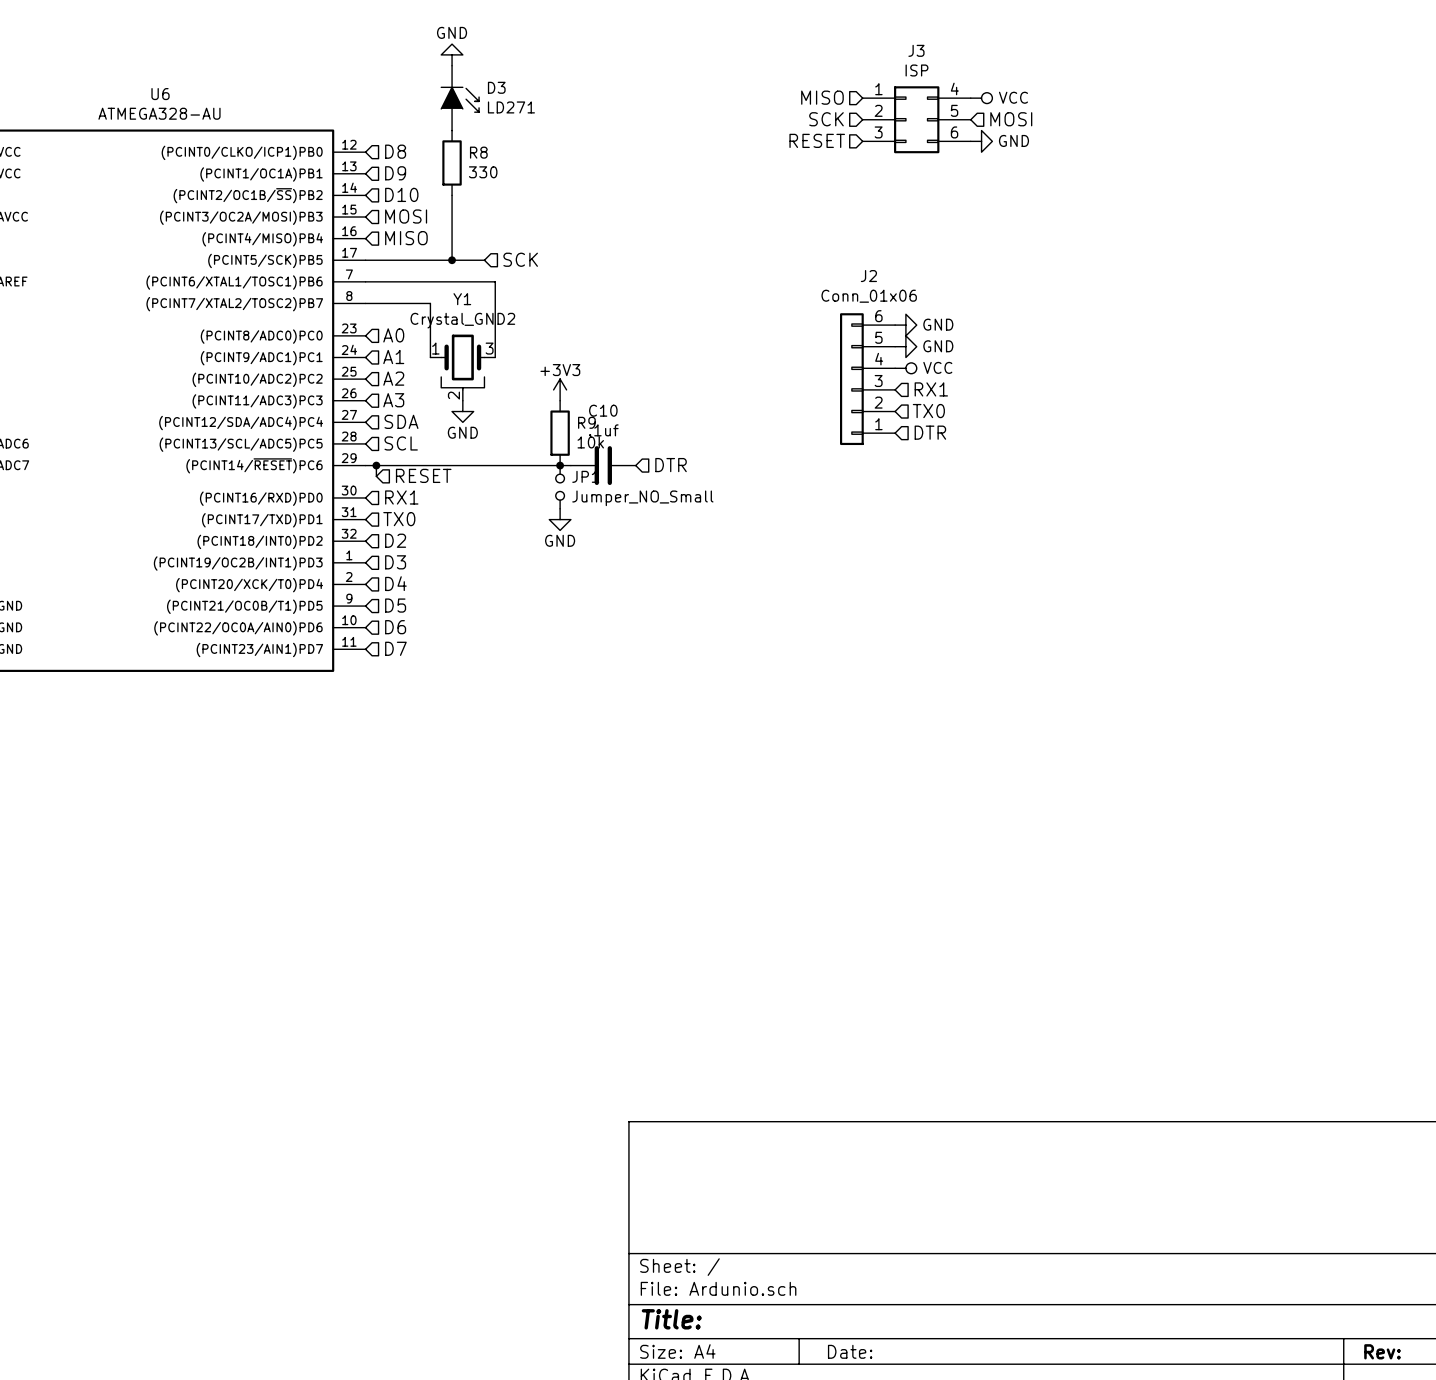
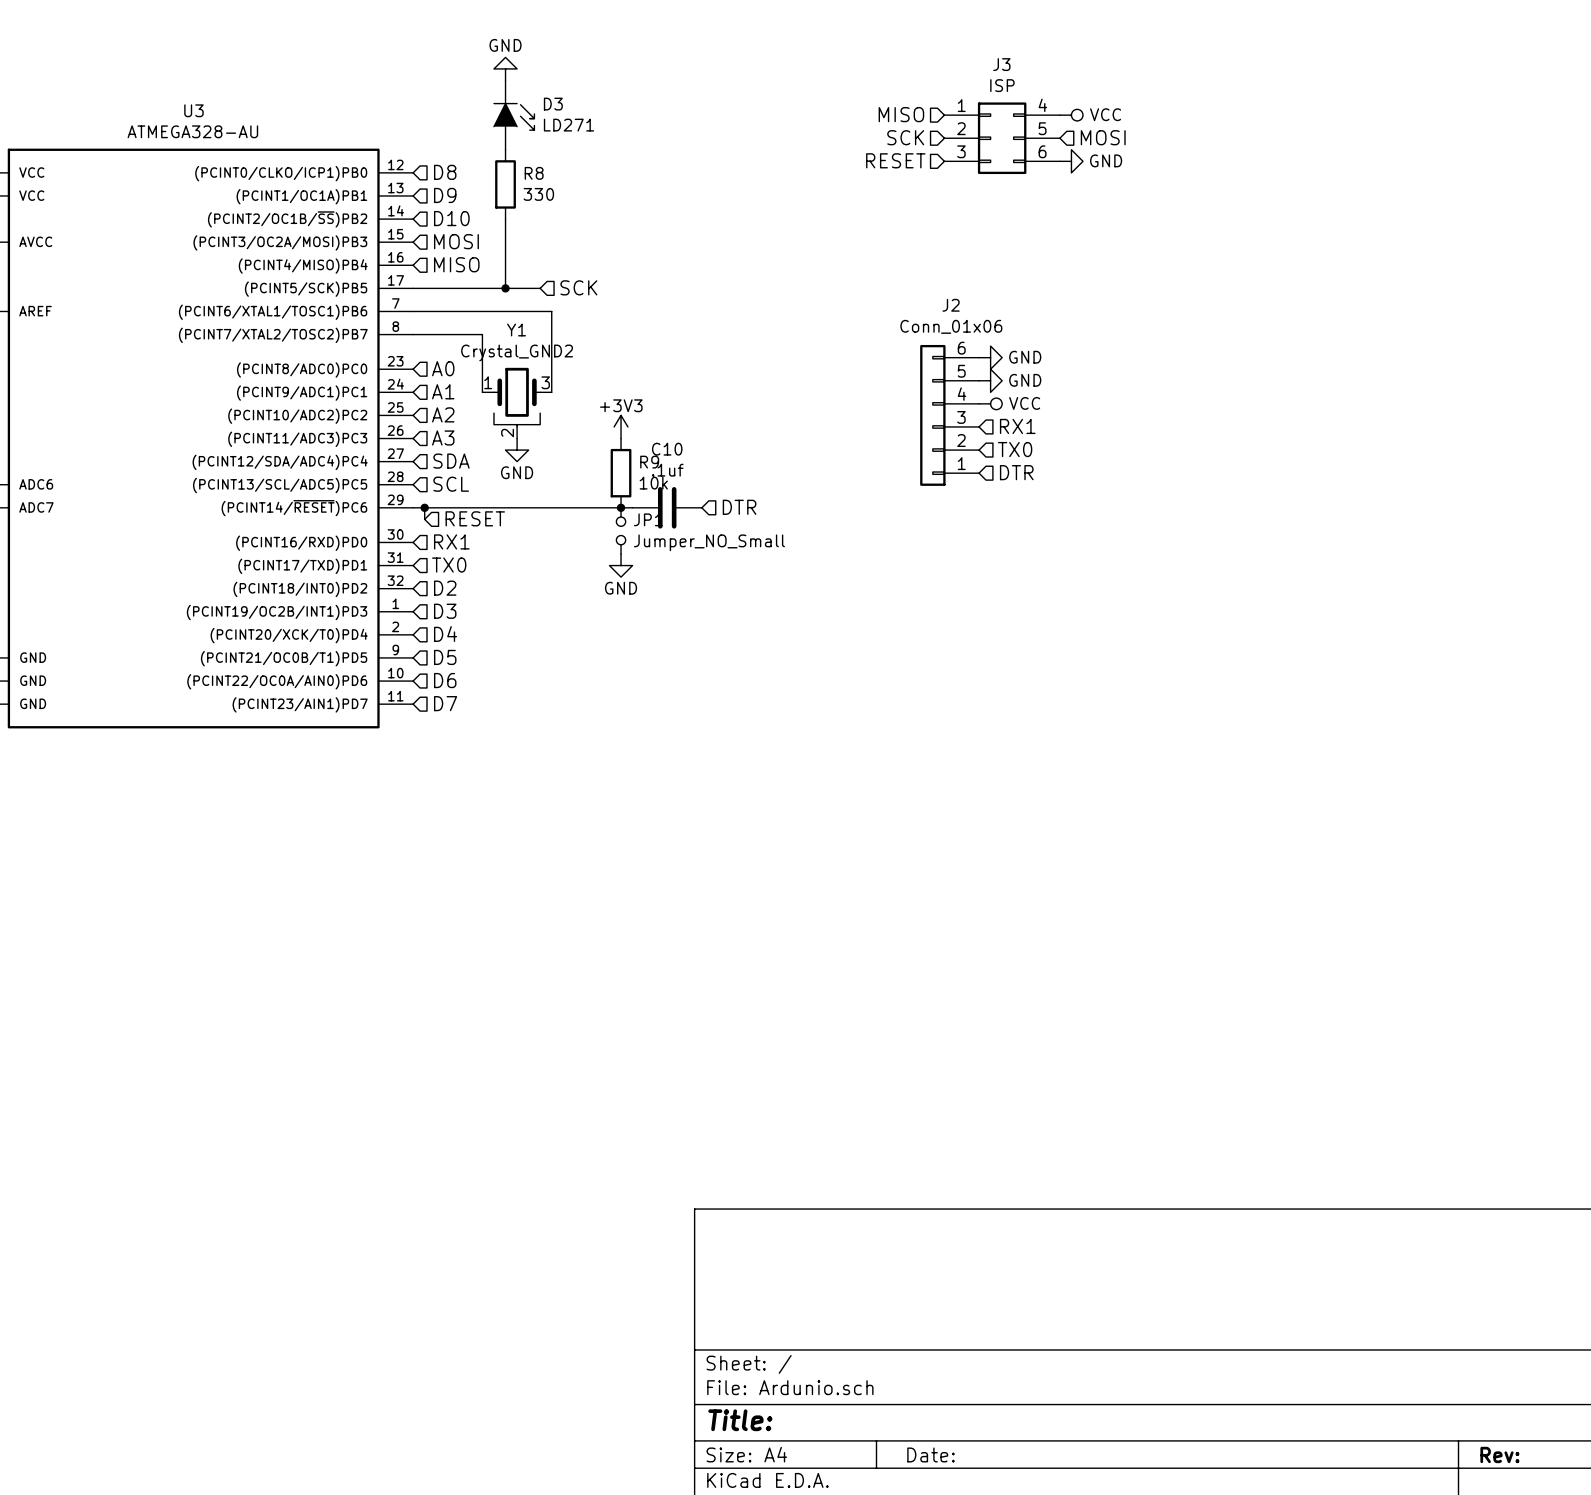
U6 name: U6 (160, 94) -> U3 (193, 110)

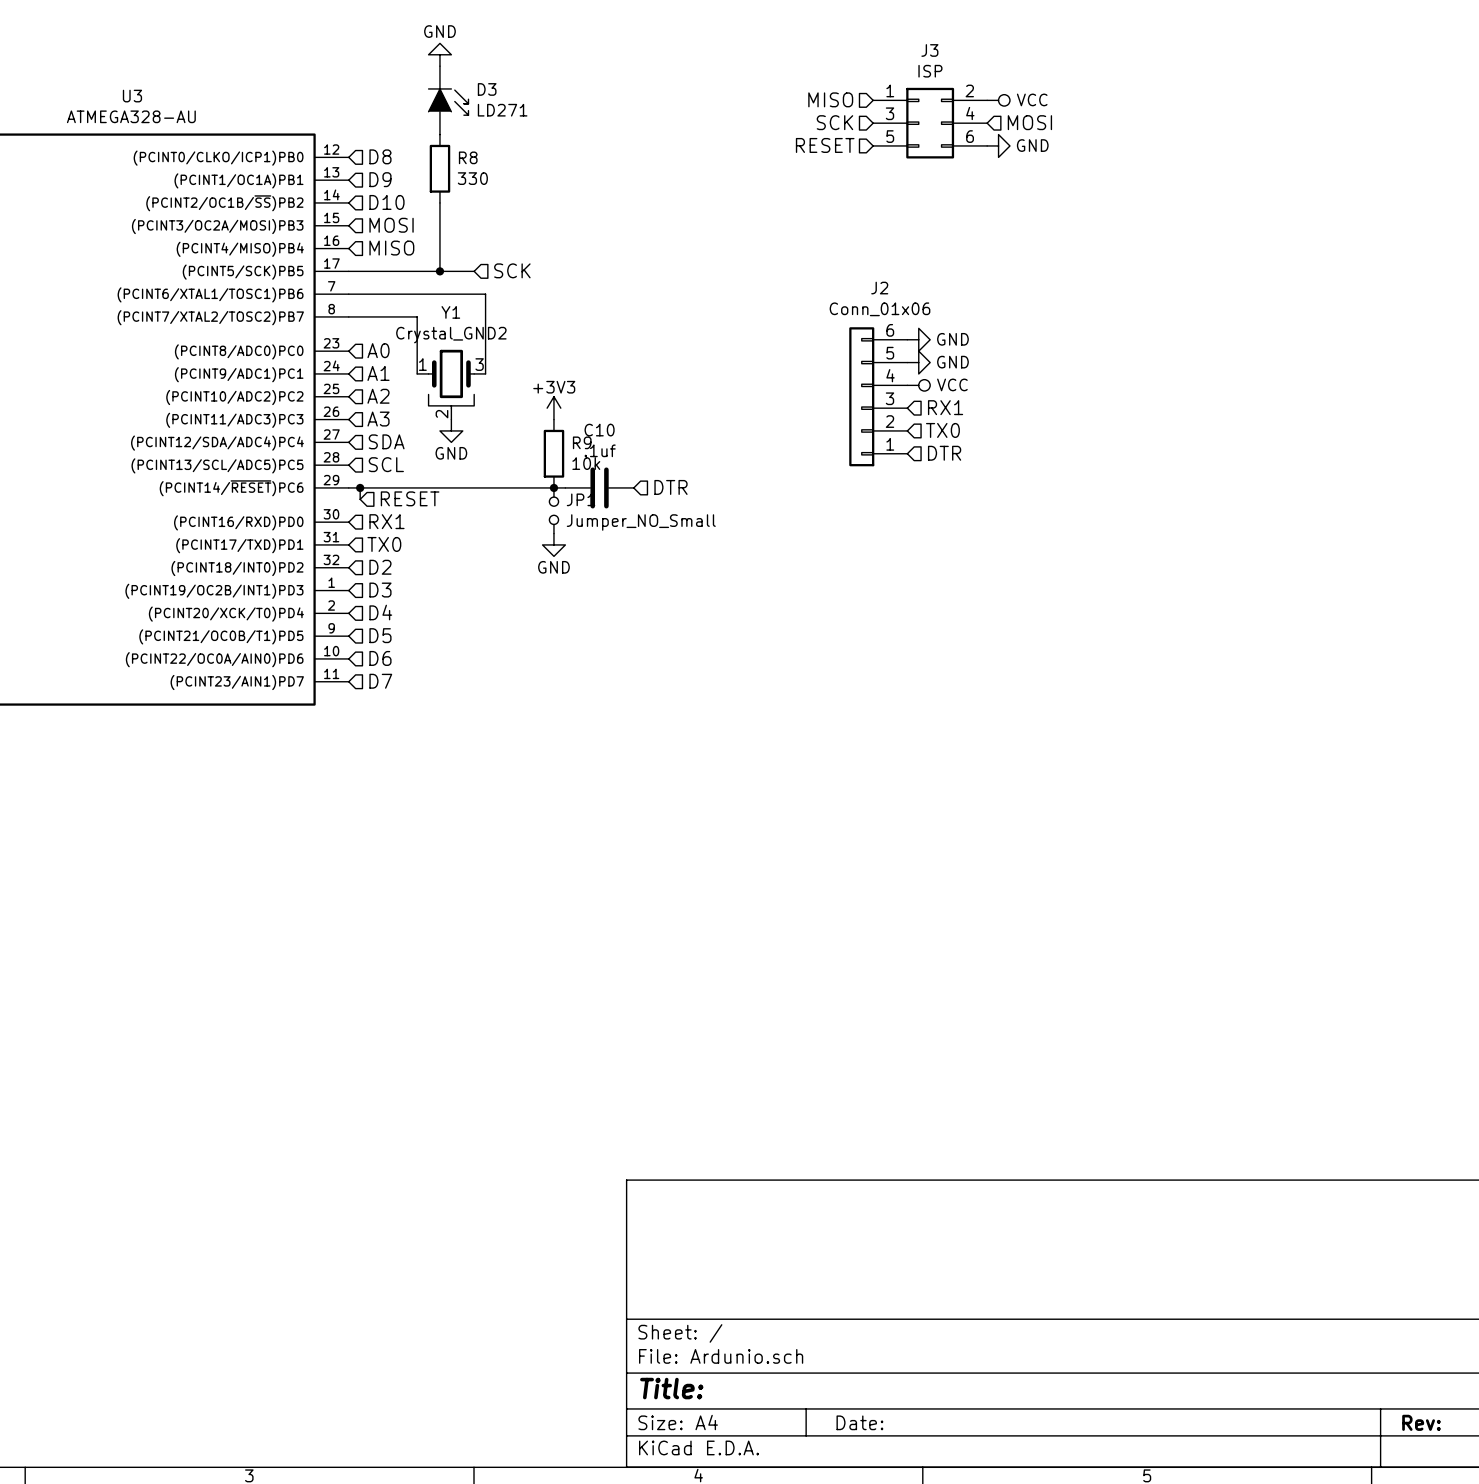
J3 pin number: 4 (1042, 105) -> 2 (969, 90)
J3 pin number: 2 (961, 128) -> 3 (889, 113)
J3 pin number: 5 (1042, 128) -> 4 (970, 113)
J3 pin number: 3 (961, 151) -> 5 (890, 136)

